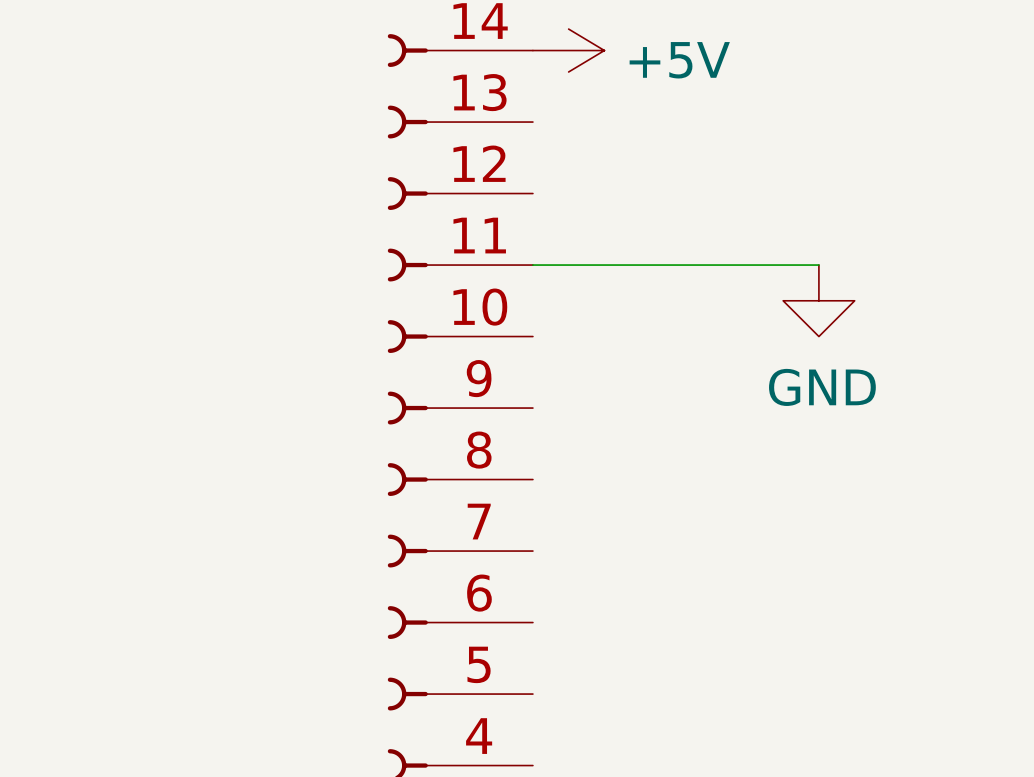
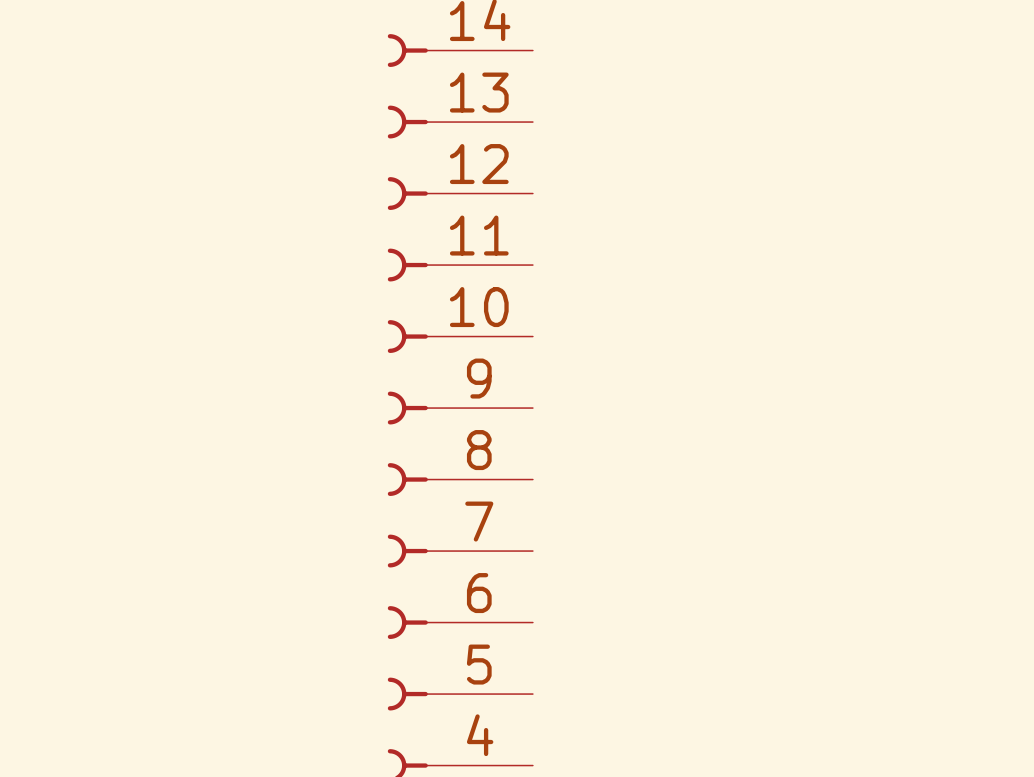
power symbol: +5V (568, 50) -> none
wire: (532, 265) (818, 265) -> none
power symbol: GND (818, 300) -> none

